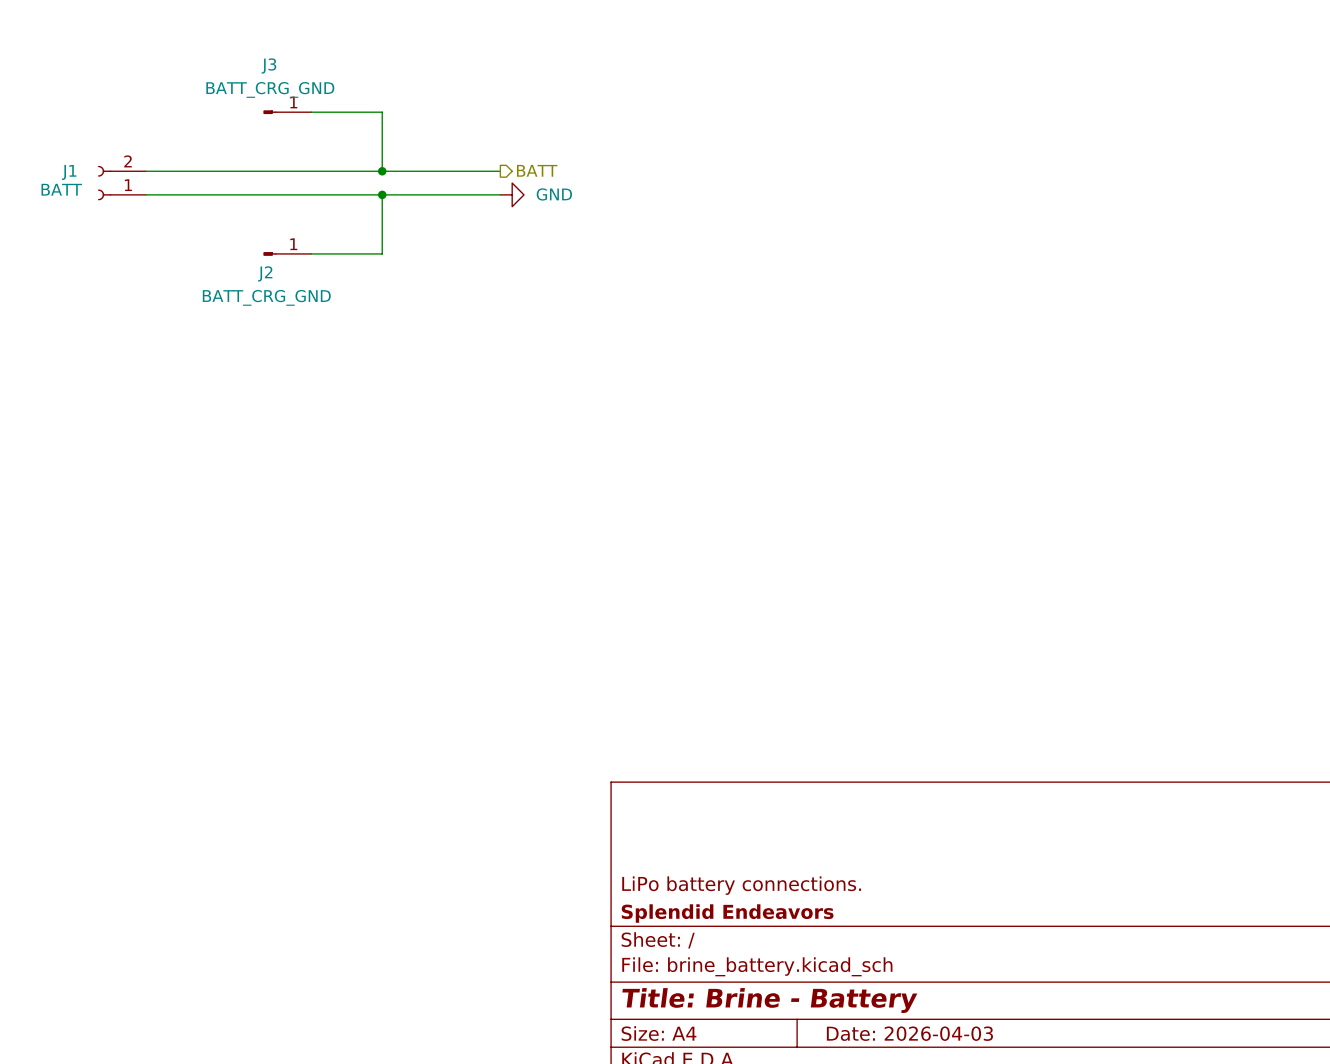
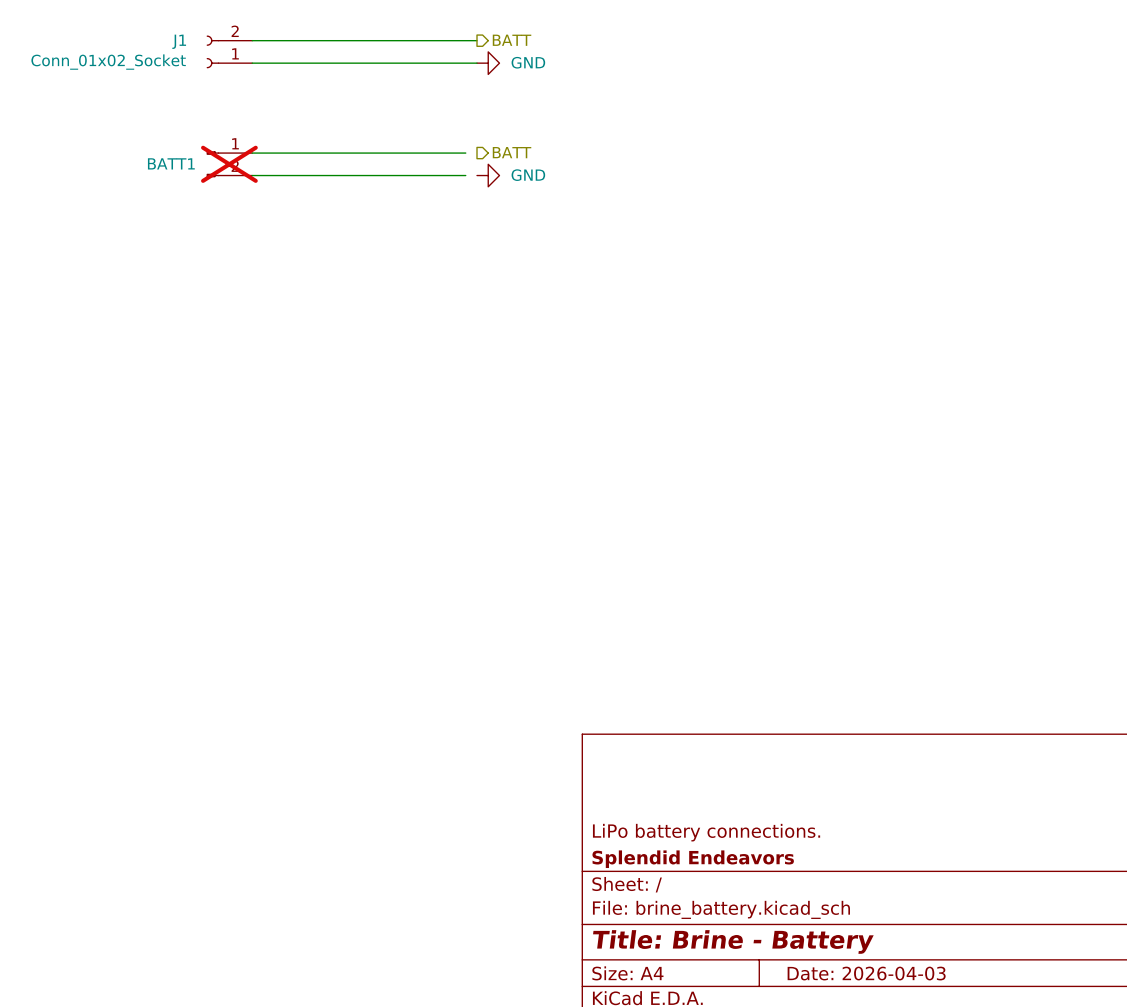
hierarchical label: none -> BATT (512, 40)
wire: none -> (252, 40) (477, 40)
wire: none -> (252, 63) (477, 63)
power symbol: none -> GND (488, 63)
J3: BATT_CRG_GND (287, 112) -> none
wire: (311, 112) (382, 112) (382, 171) -> none
wire: (145, 171) (264, 171) -> none
junction: (382, 171) -> none
wire: (488, 171) (500, 171) -> none
J1 position: (121, 183) -> (229, 51)
BATT1: none -> (229, 164)
J1 value: BATT (61, 189) -> Conn_01x02_Socket (108, 62)
wire: (145, 194) (264, 194) -> none
wire: (382, 194) (382, 253) (311, 253) -> none
junction: (382, 194) -> none
wire: (488, 194) (500, 194) -> none
J2: BATT_CRG_GND (287, 253) -> none

